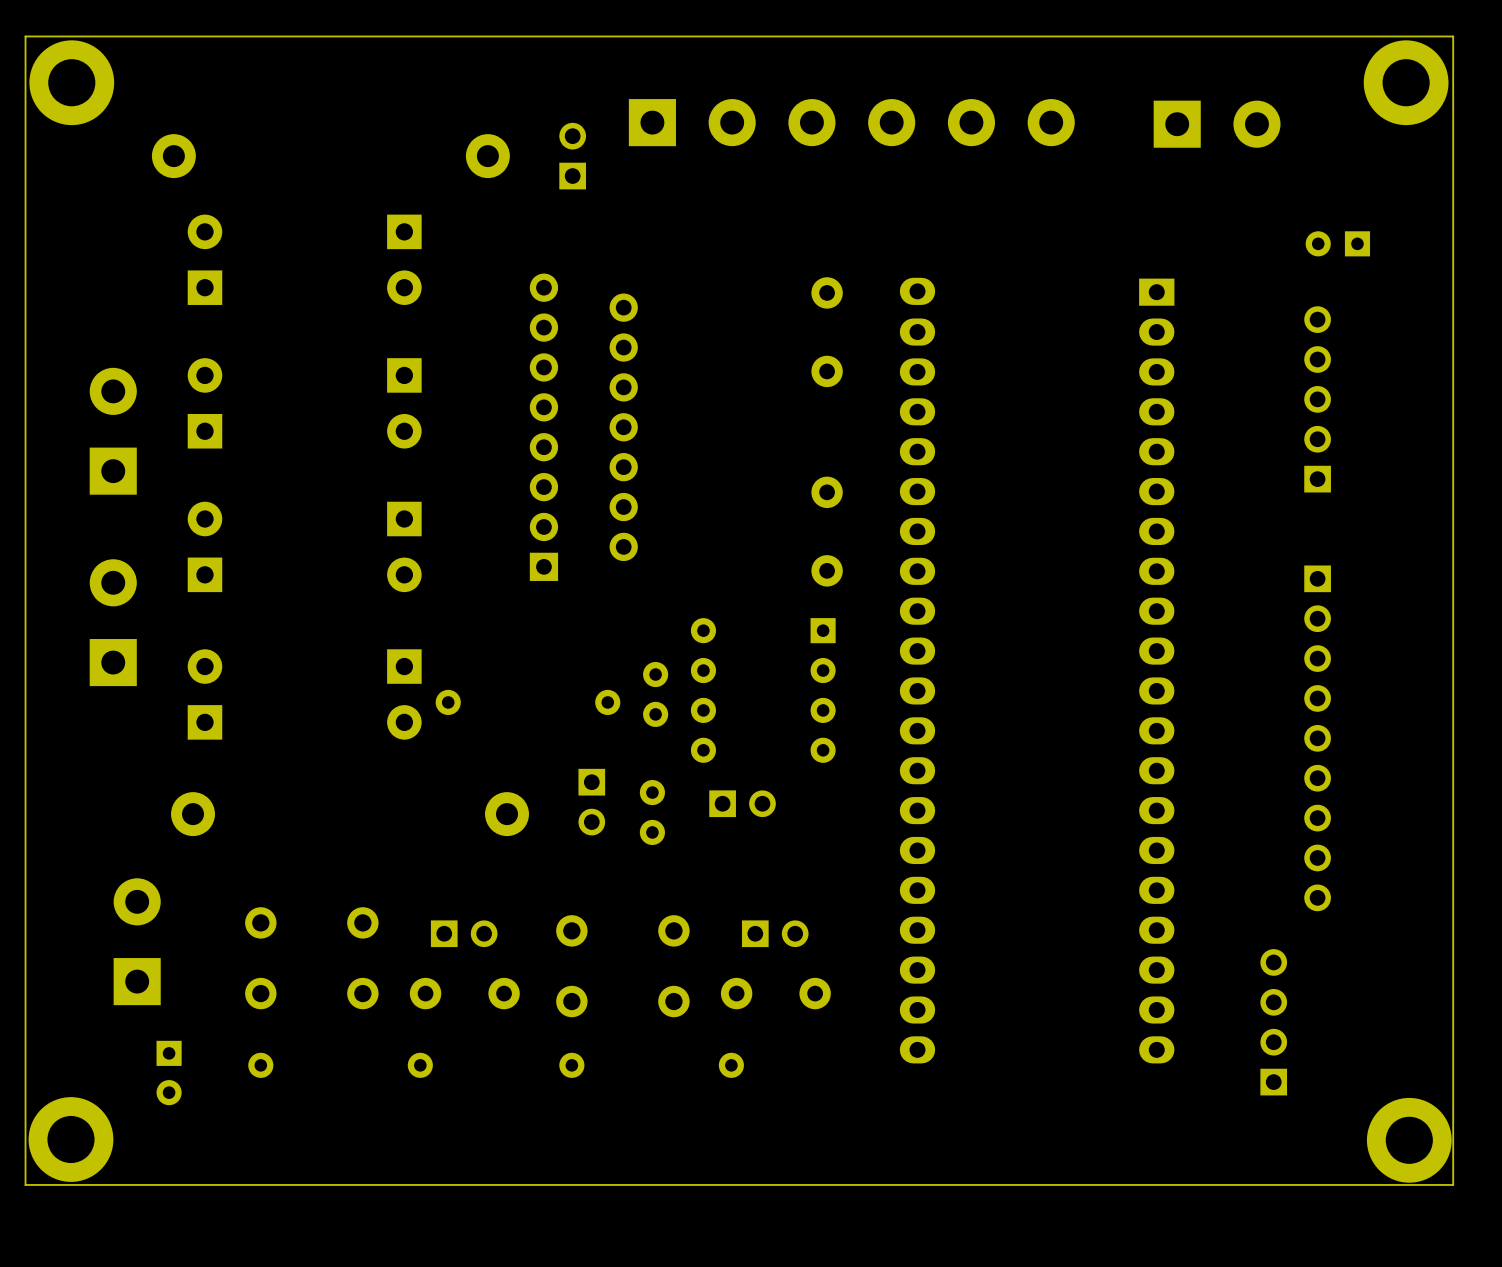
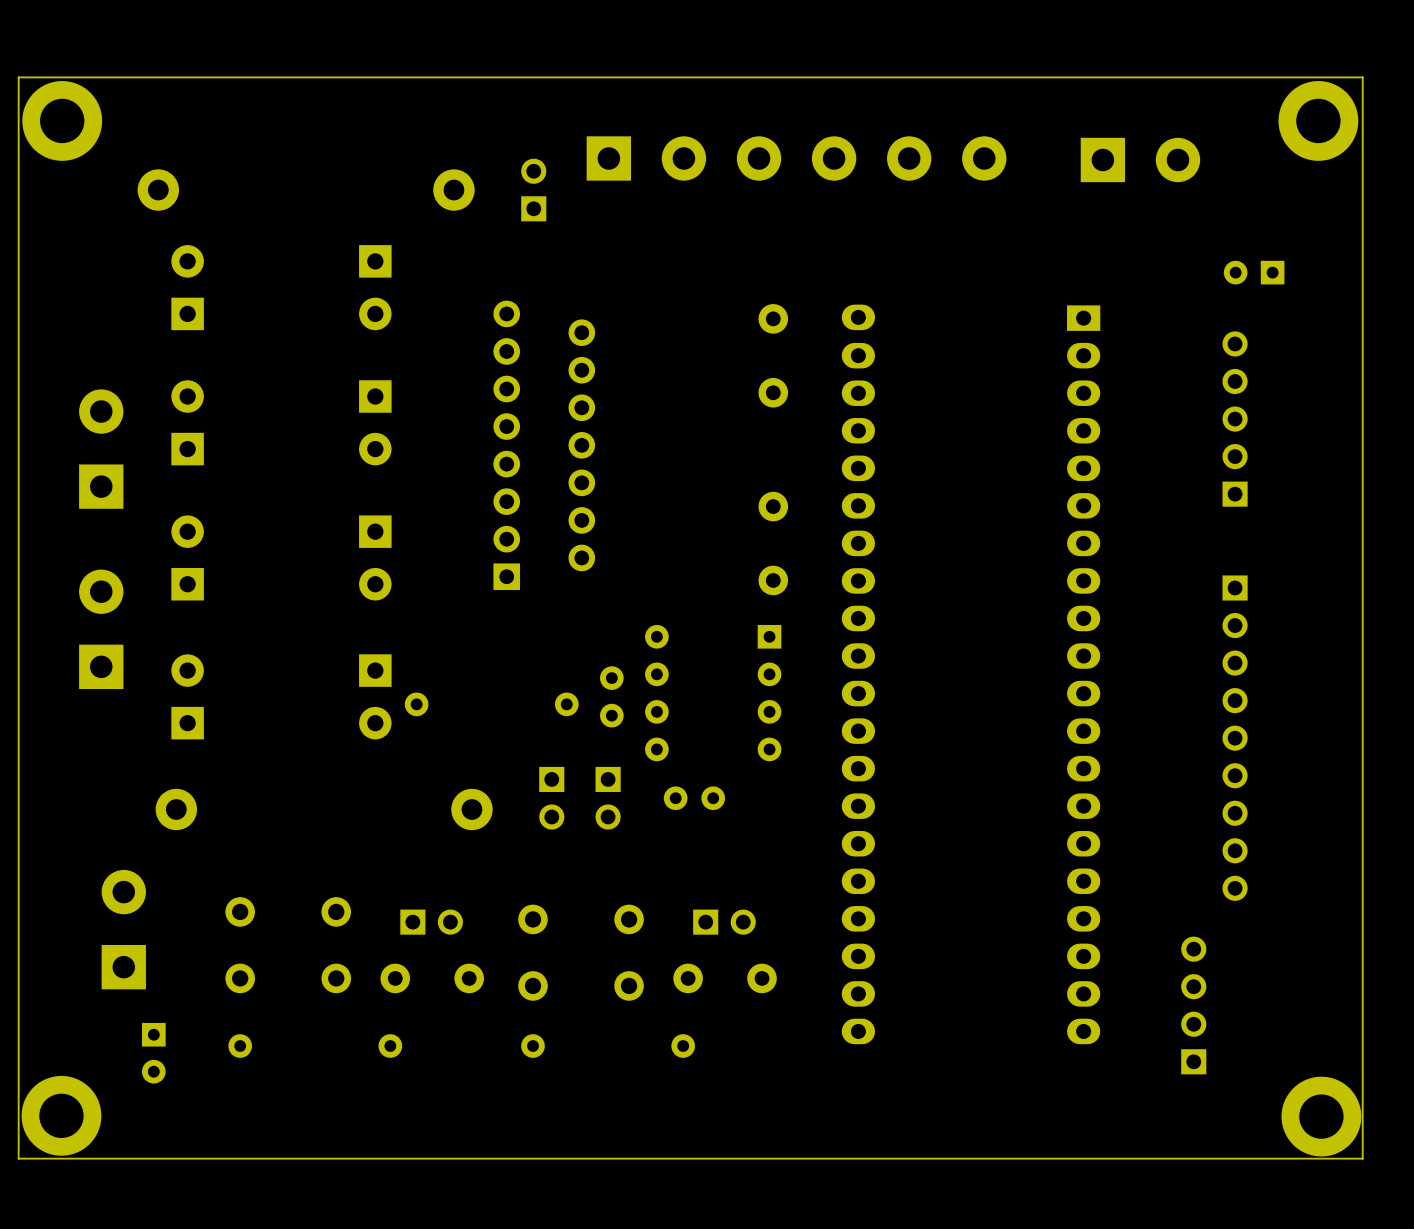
part footprint: [639, 780, 665, 846] -> [595, 766, 621, 830]
part footprint: [709, 790, 776, 818] -> [663, 786, 726, 811]

